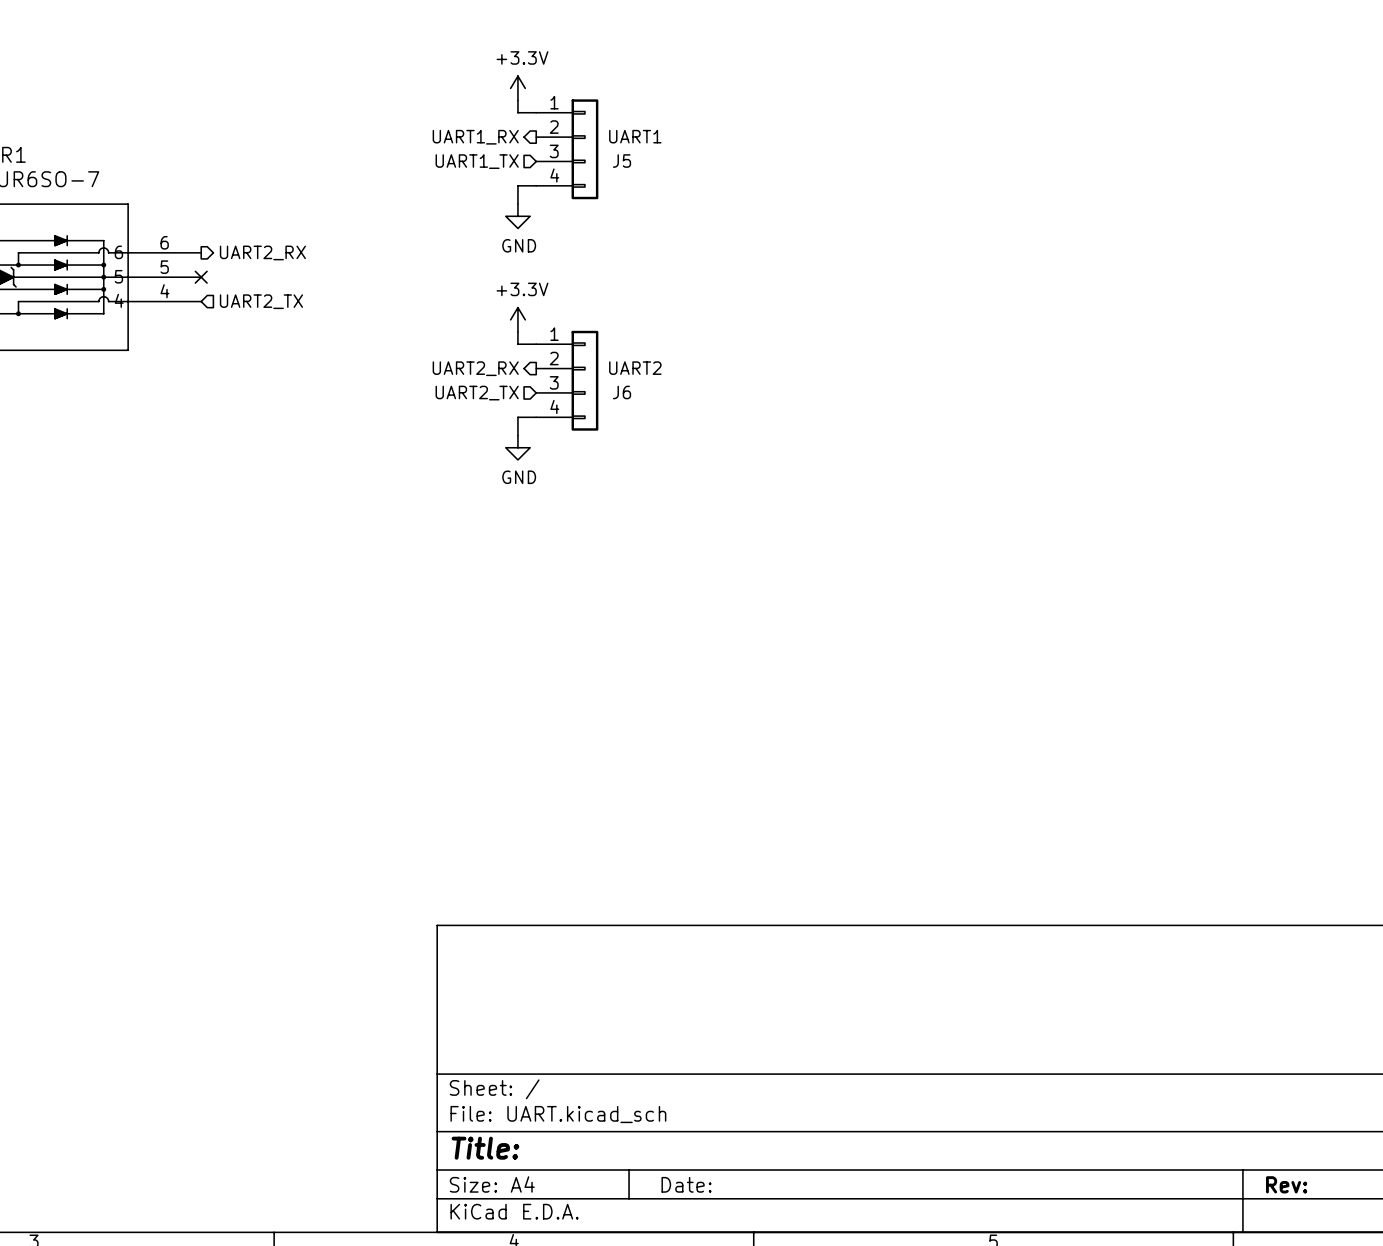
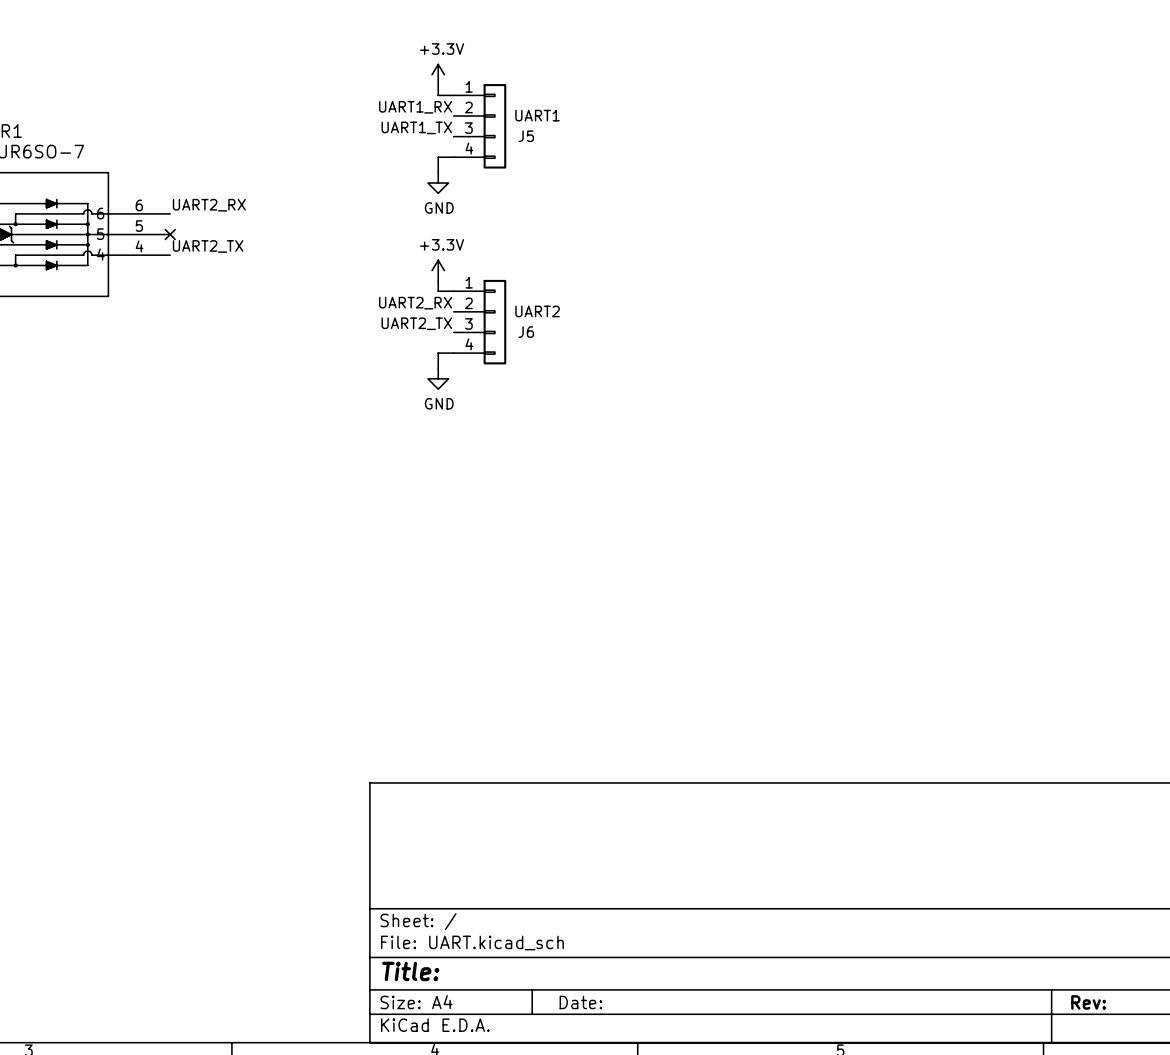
label: none -> UART1_RX (415, 107)
hierarchical label: UART1_RX (475, 137) -> none
label: none -> UART1_TX (416, 127)
hierarchical label: UART1_TX (477, 161) -> none
label: none -> UART2_RX (209, 205)
hierarchical label: UART2_RX (262, 252) -> none
label: none -> UART2_TX (208, 246)
hierarchical label: UART2_TX (261, 301) -> none
label: none -> UART2_RX (415, 303)
hierarchical label: UART2_RX (475, 368) -> none
label: none -> UART2_TX (416, 323)
hierarchical label: UART2_TX (477, 393) -> none

